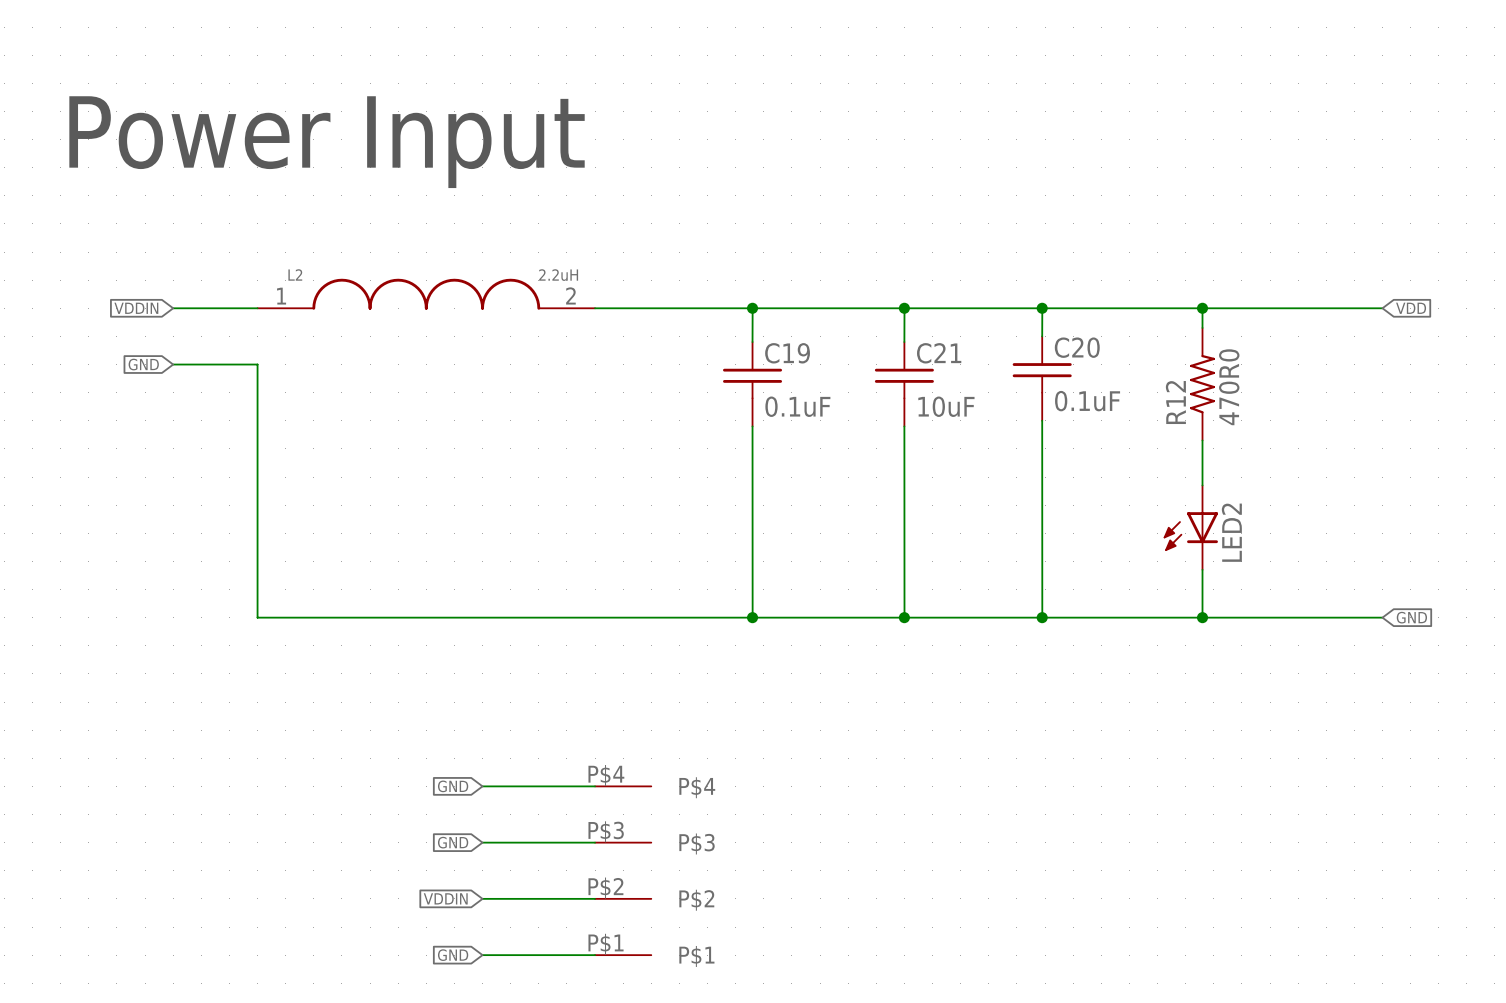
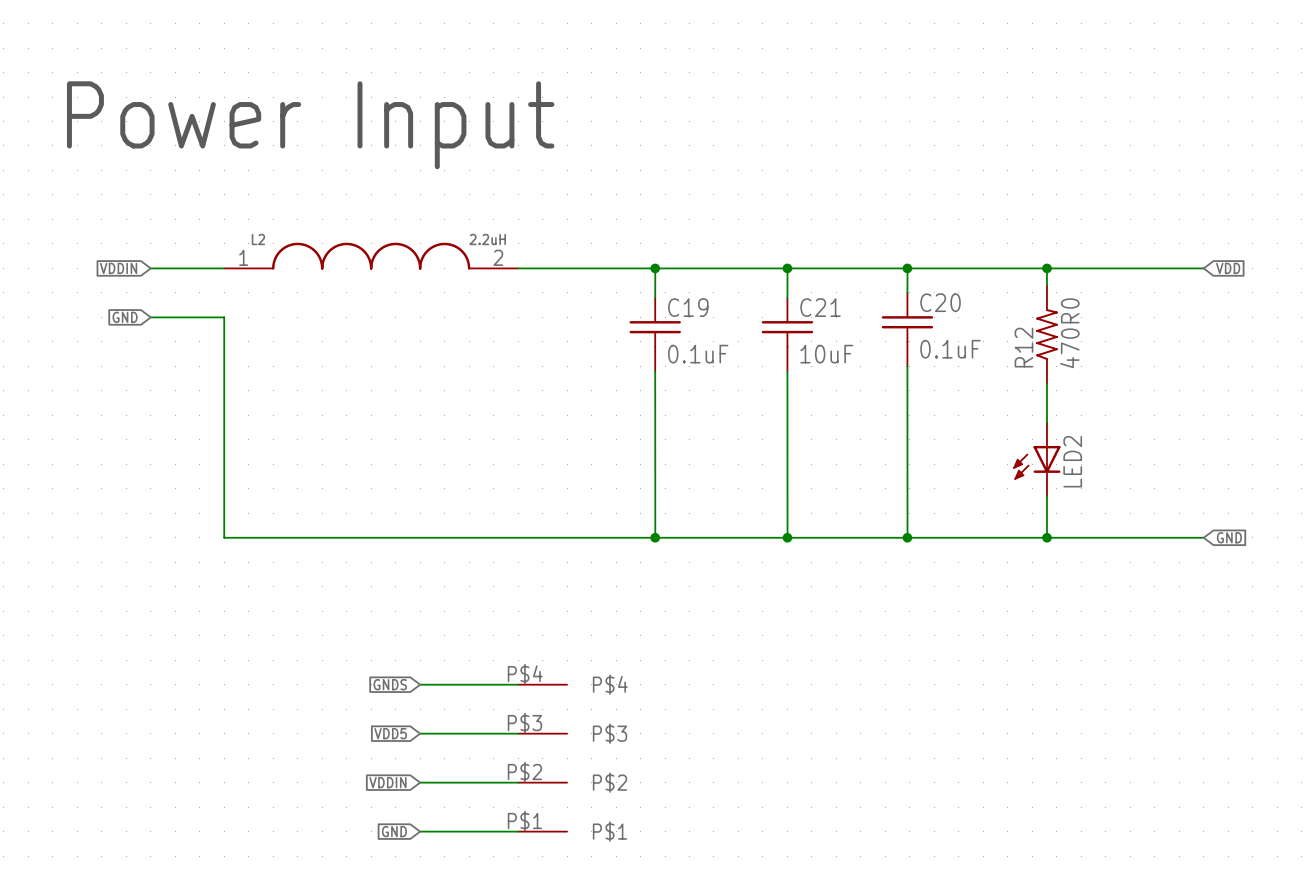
global label: GND (453, 786) -> GNDS (390, 684)
global label: GND (453, 842) -> VDD5 (390, 733)

